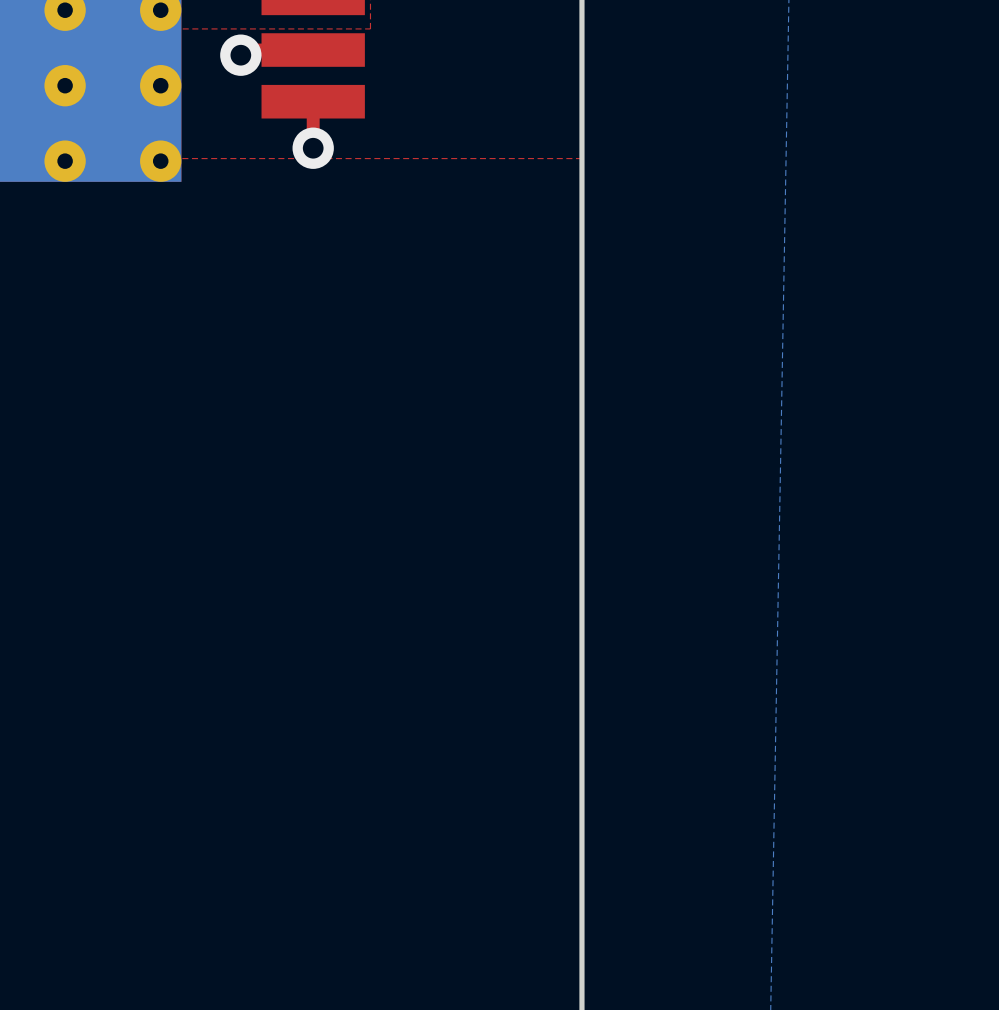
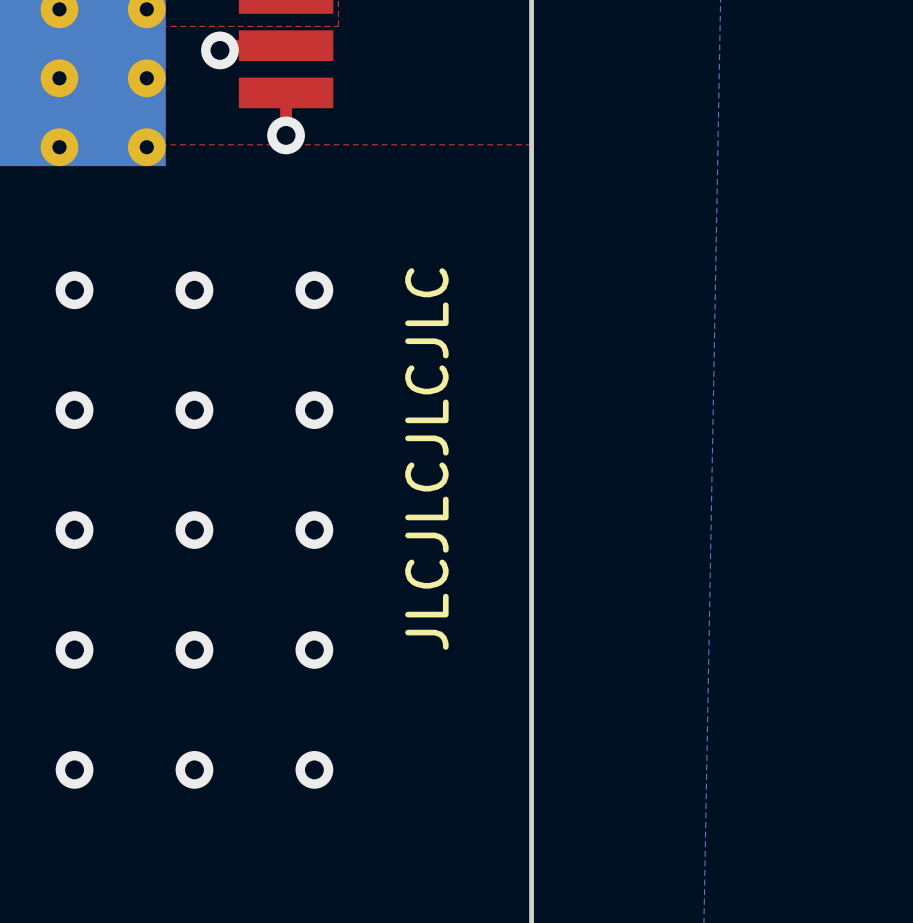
via: none -> (74, 290)
via: none -> (194, 290)
via: none -> (314, 290)
via: none -> (74, 410)
via: none -> (194, 410)
via: none -> (314, 410)
text: none -> JLCJLCJLCJLC (426, 459)
via: none -> (74, 530)
via: none -> (194, 530)
via: none -> (314, 530)
via: none -> (74, 649)
via: none -> (194, 649)
via: none -> (314, 649)
via: none -> (74, 769)
via: none -> (194, 769)
via: none -> (314, 769)

